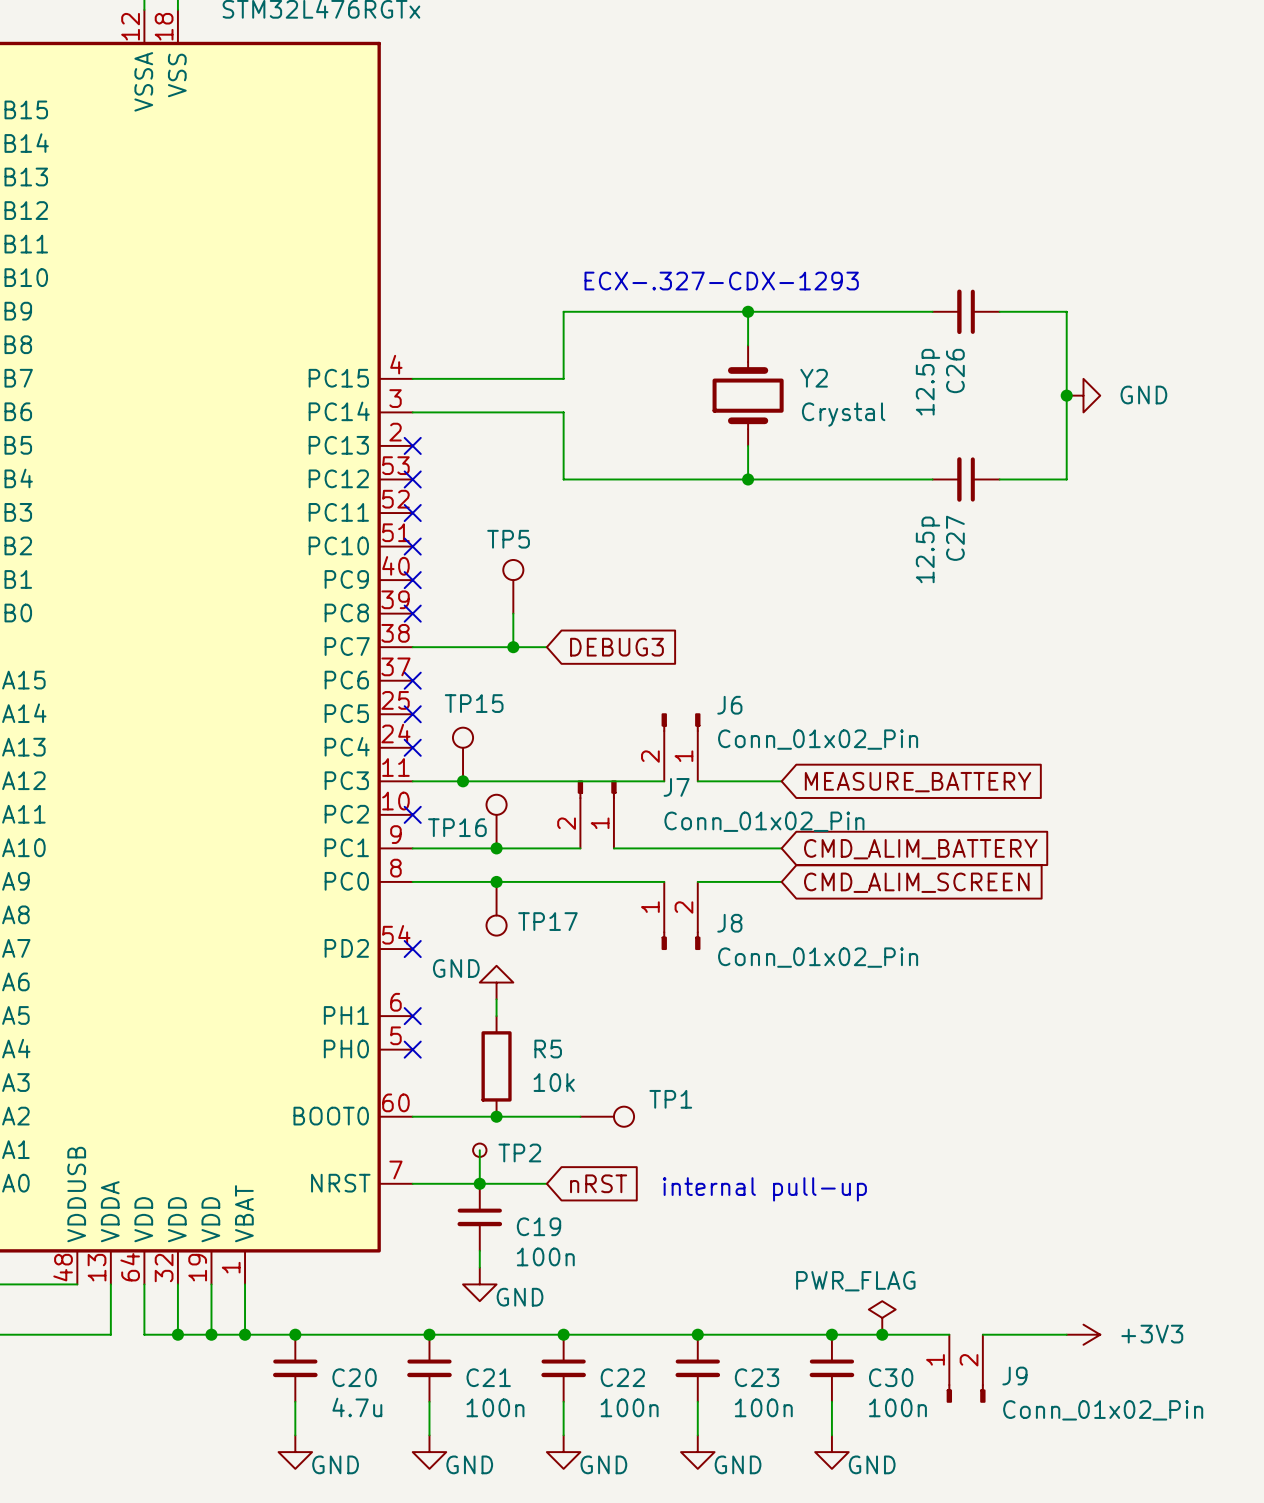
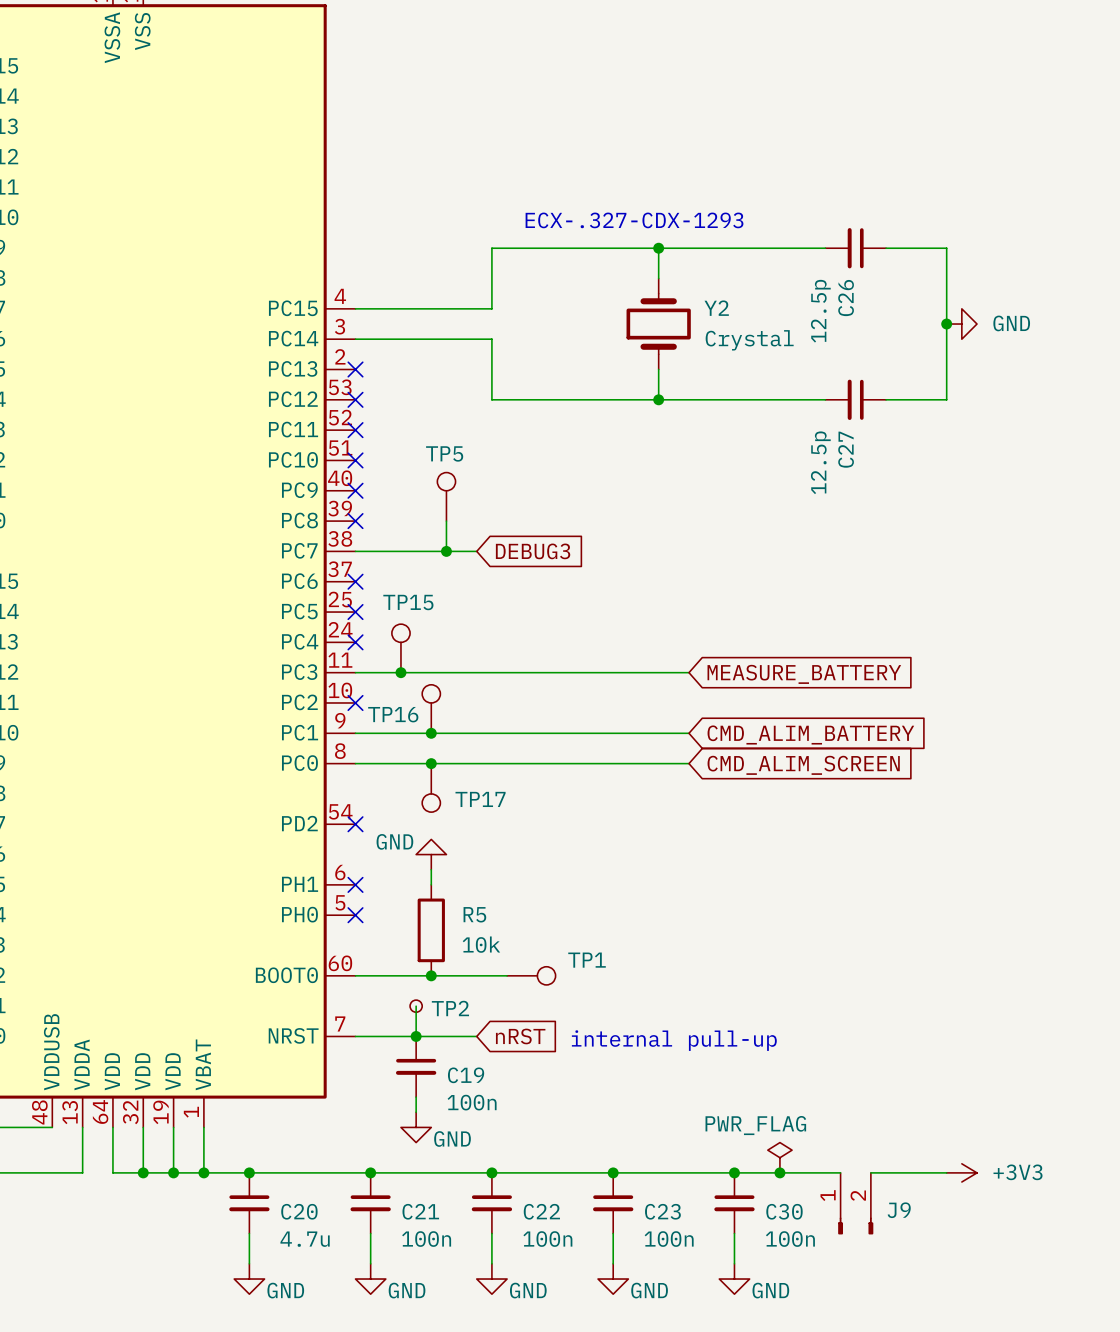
J6: Conn_01x02_Pin (681, 747) -> none
wire: none -> (582, 672) (613, 672)
J7: Conn_01x02_Pin (597, 814) -> none
wire: none -> (507, 733) (537, 733)
wire: none -> (582, 763) (613, 763)
J8: Conn_01x02_Pin (681, 915) -> none
J9 value: Conn_01x02_Pin (1103, 1410) -> none

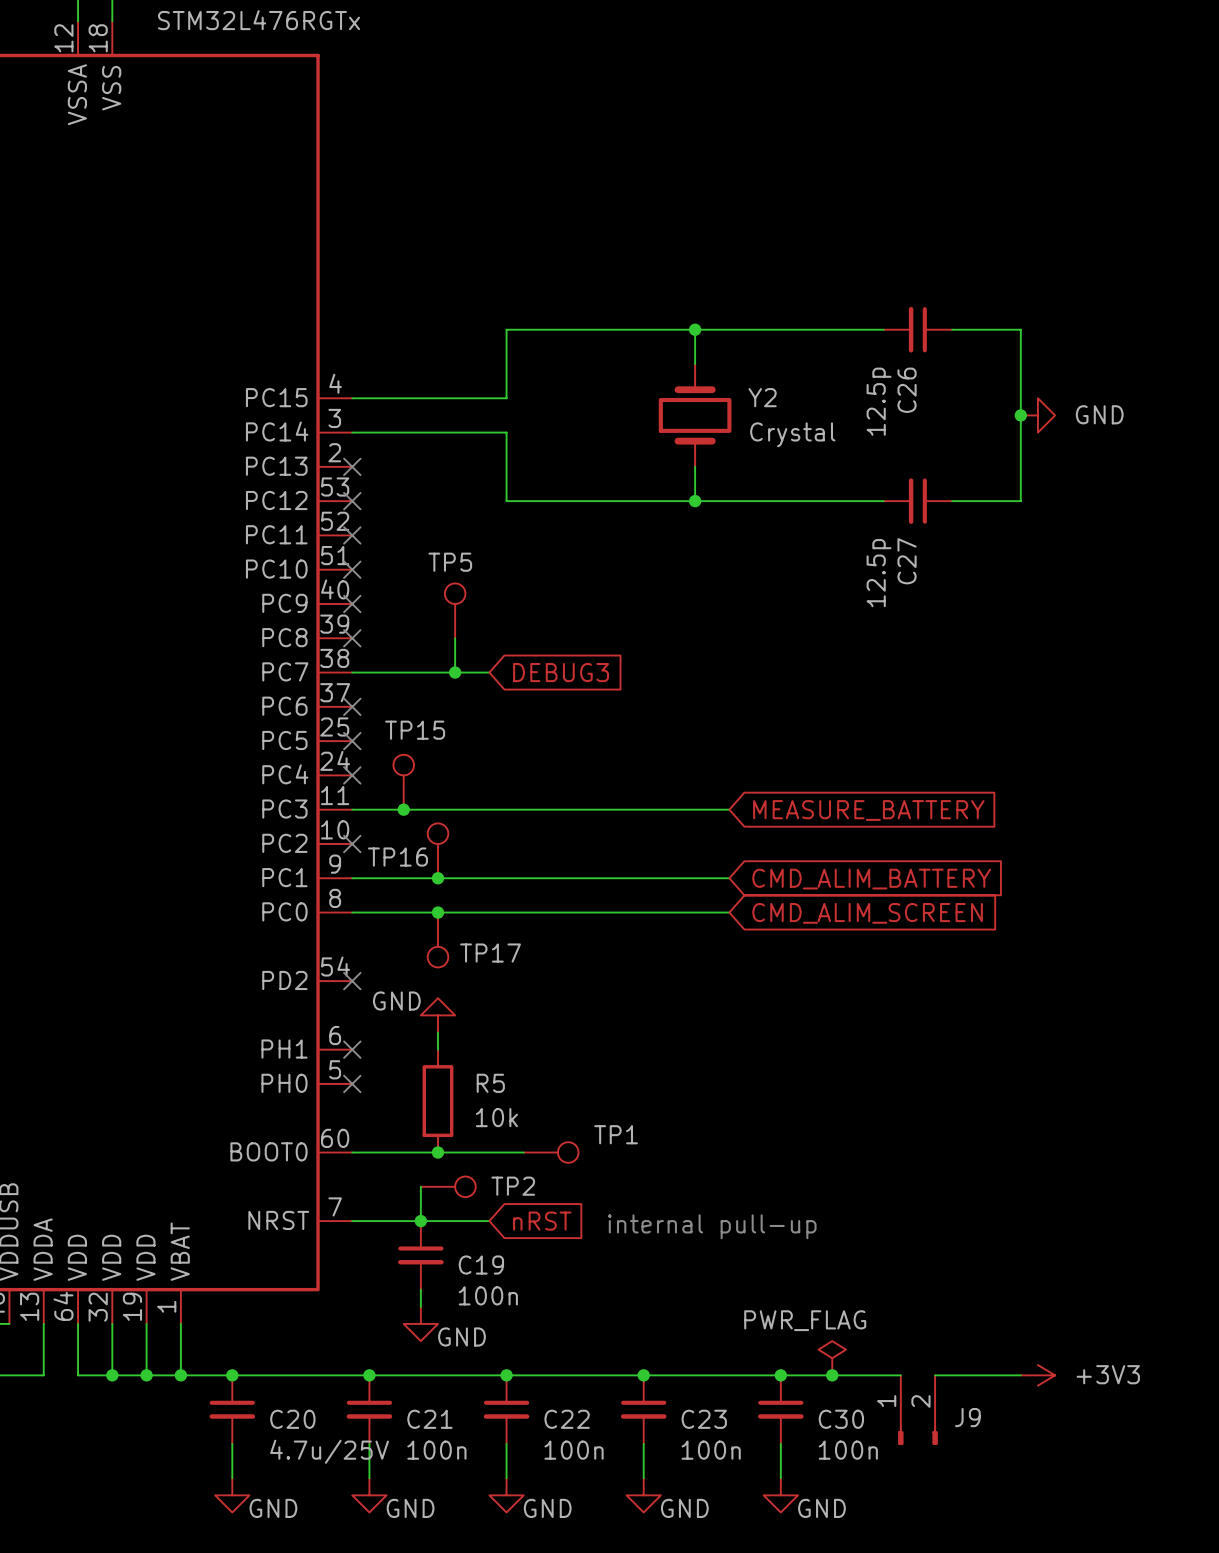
text: ECX-.327-CDX-1293 (634, 220) -> none
TP2 symbol: [410, 1000, 423, 1013] -> [420, 1176, 476, 1198]
C20 value: 4.7u (305, 1239) -> 4.7u/25V (329, 1451)

